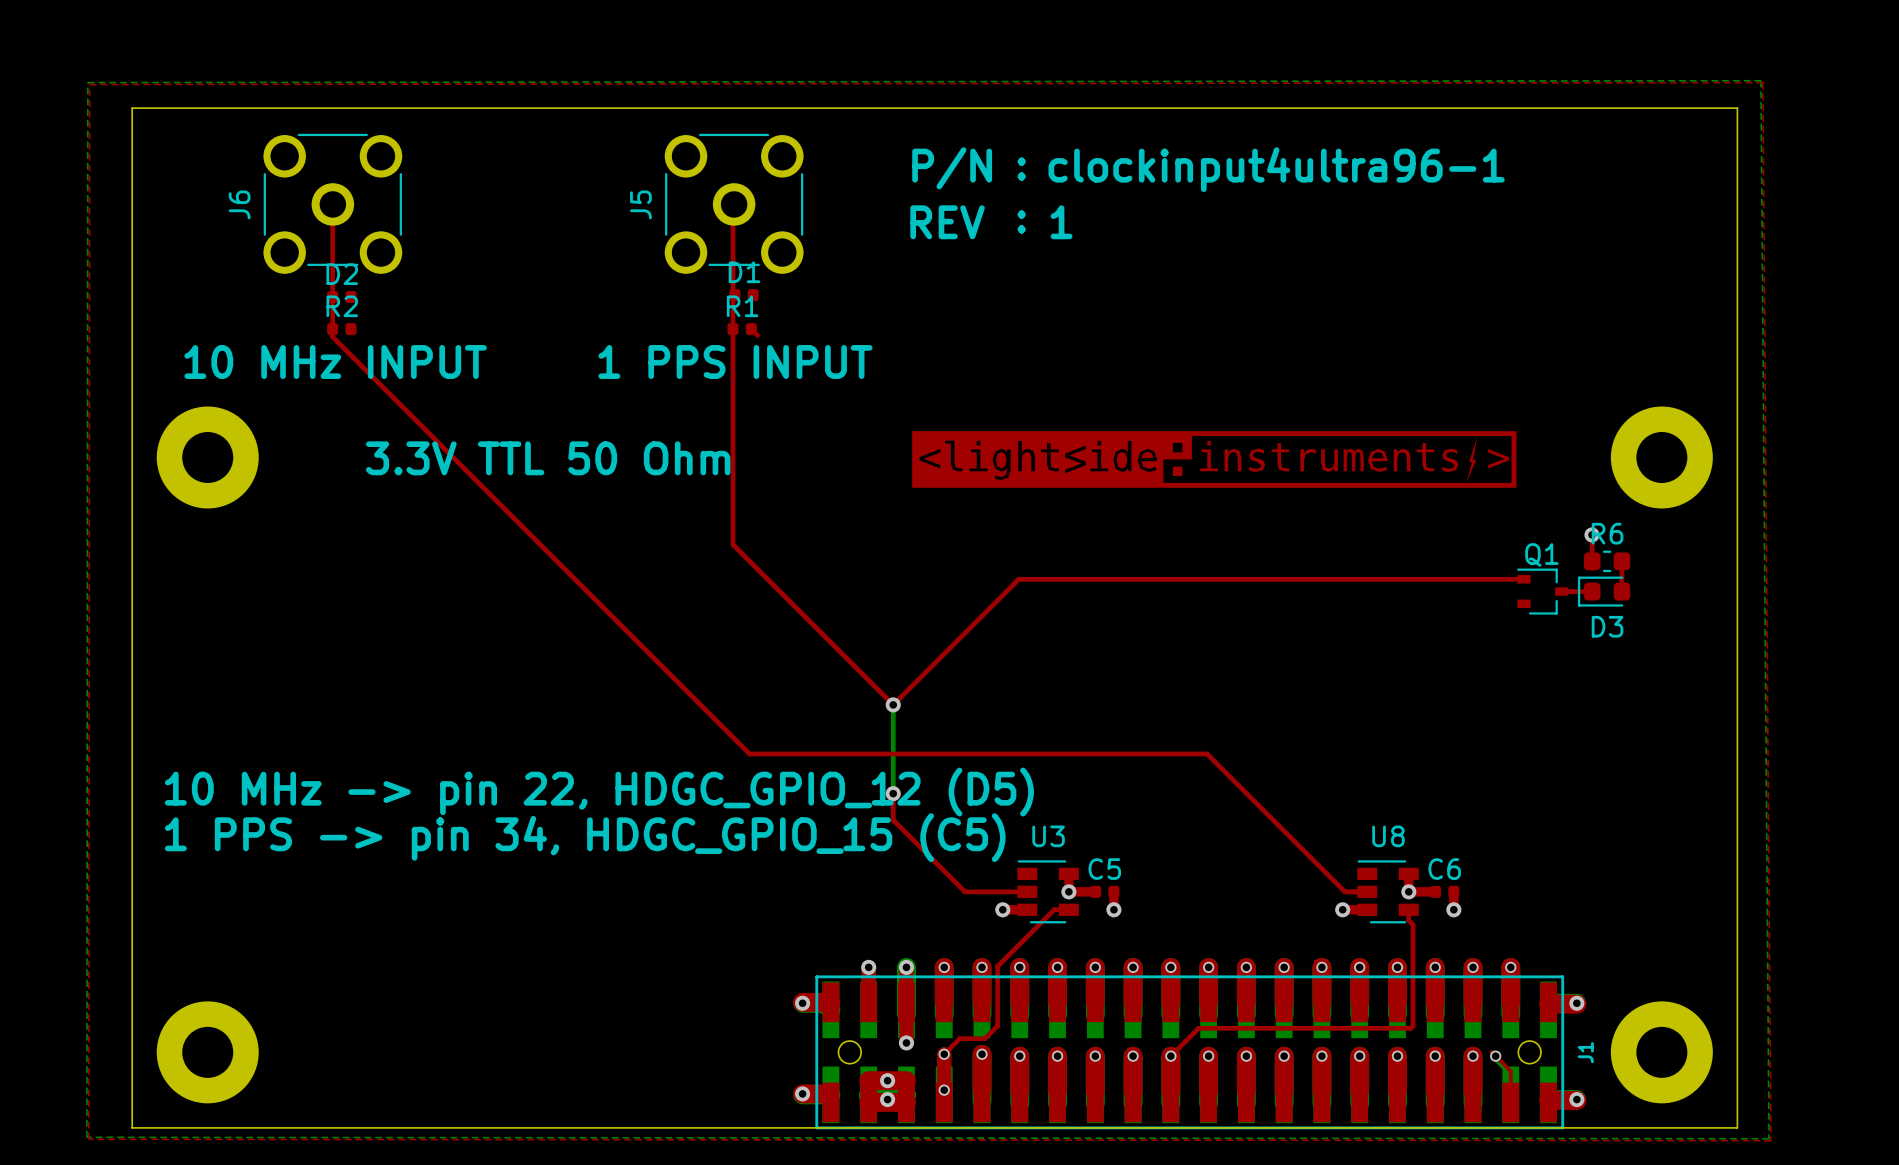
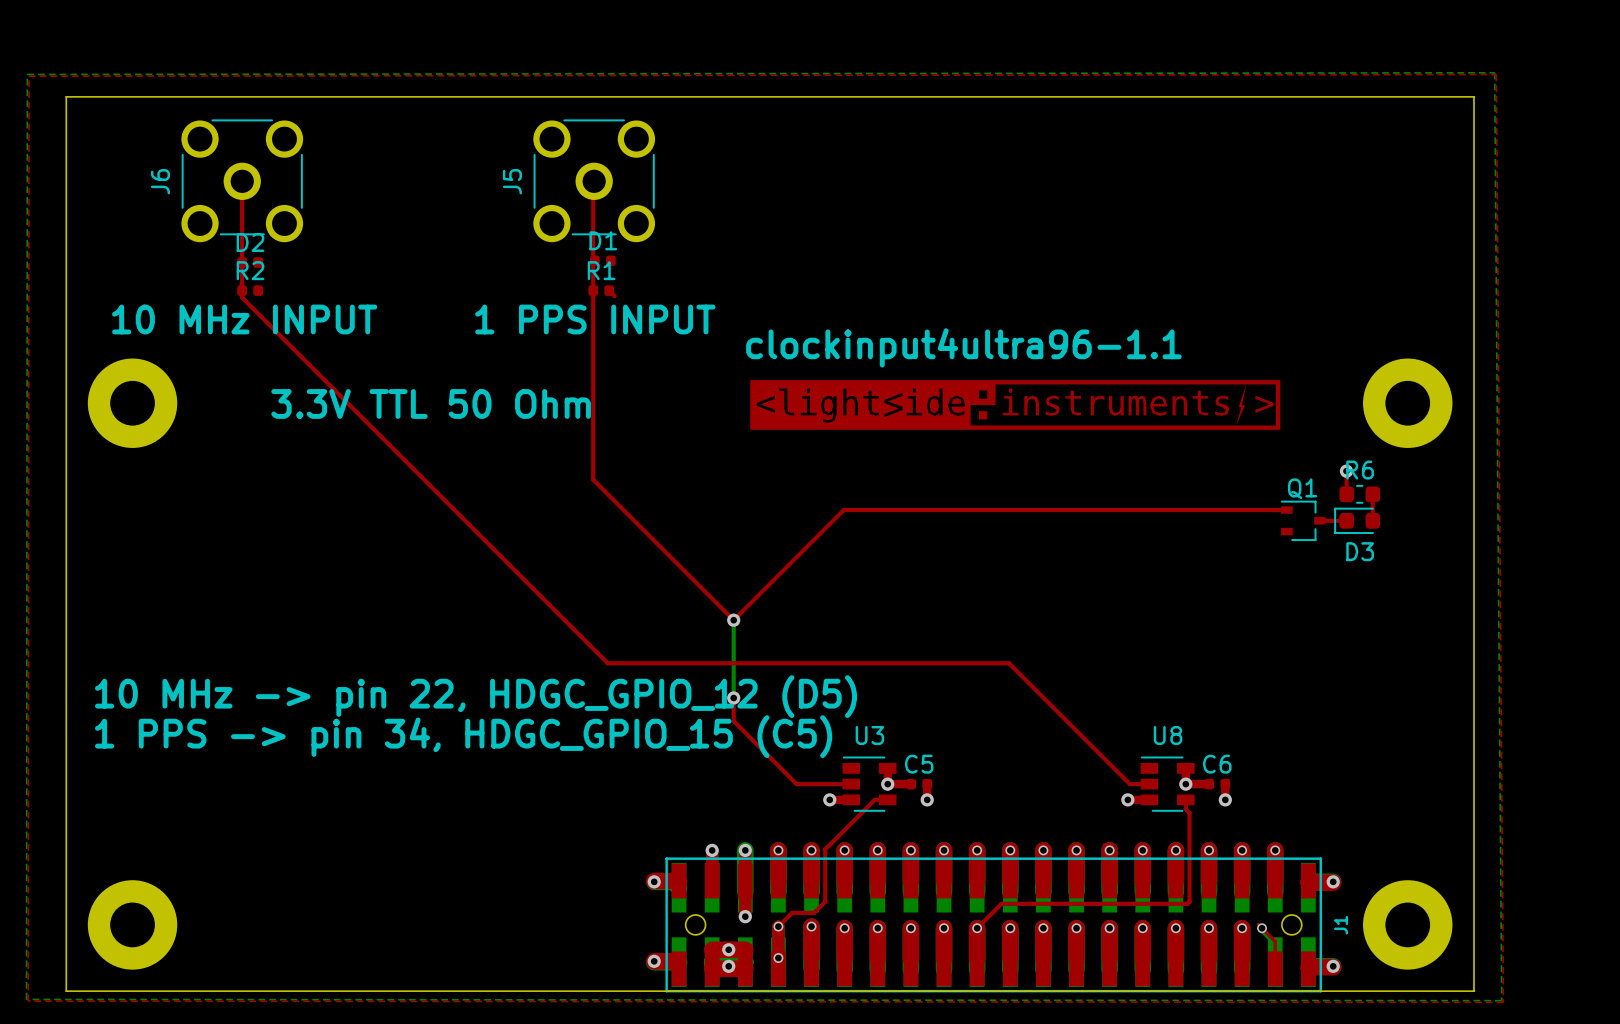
text: P/N (952, 168) -> none
text: : (1021, 169) -> none
text: clockinput4ultra96-1 (1276, 169) -> none
text: REV (947, 222) -> none
text: : (1021, 222) -> none
text: 1 (1061, 222) -> none
text: none -> clockinput4ultra96-1.1 (963, 347)

